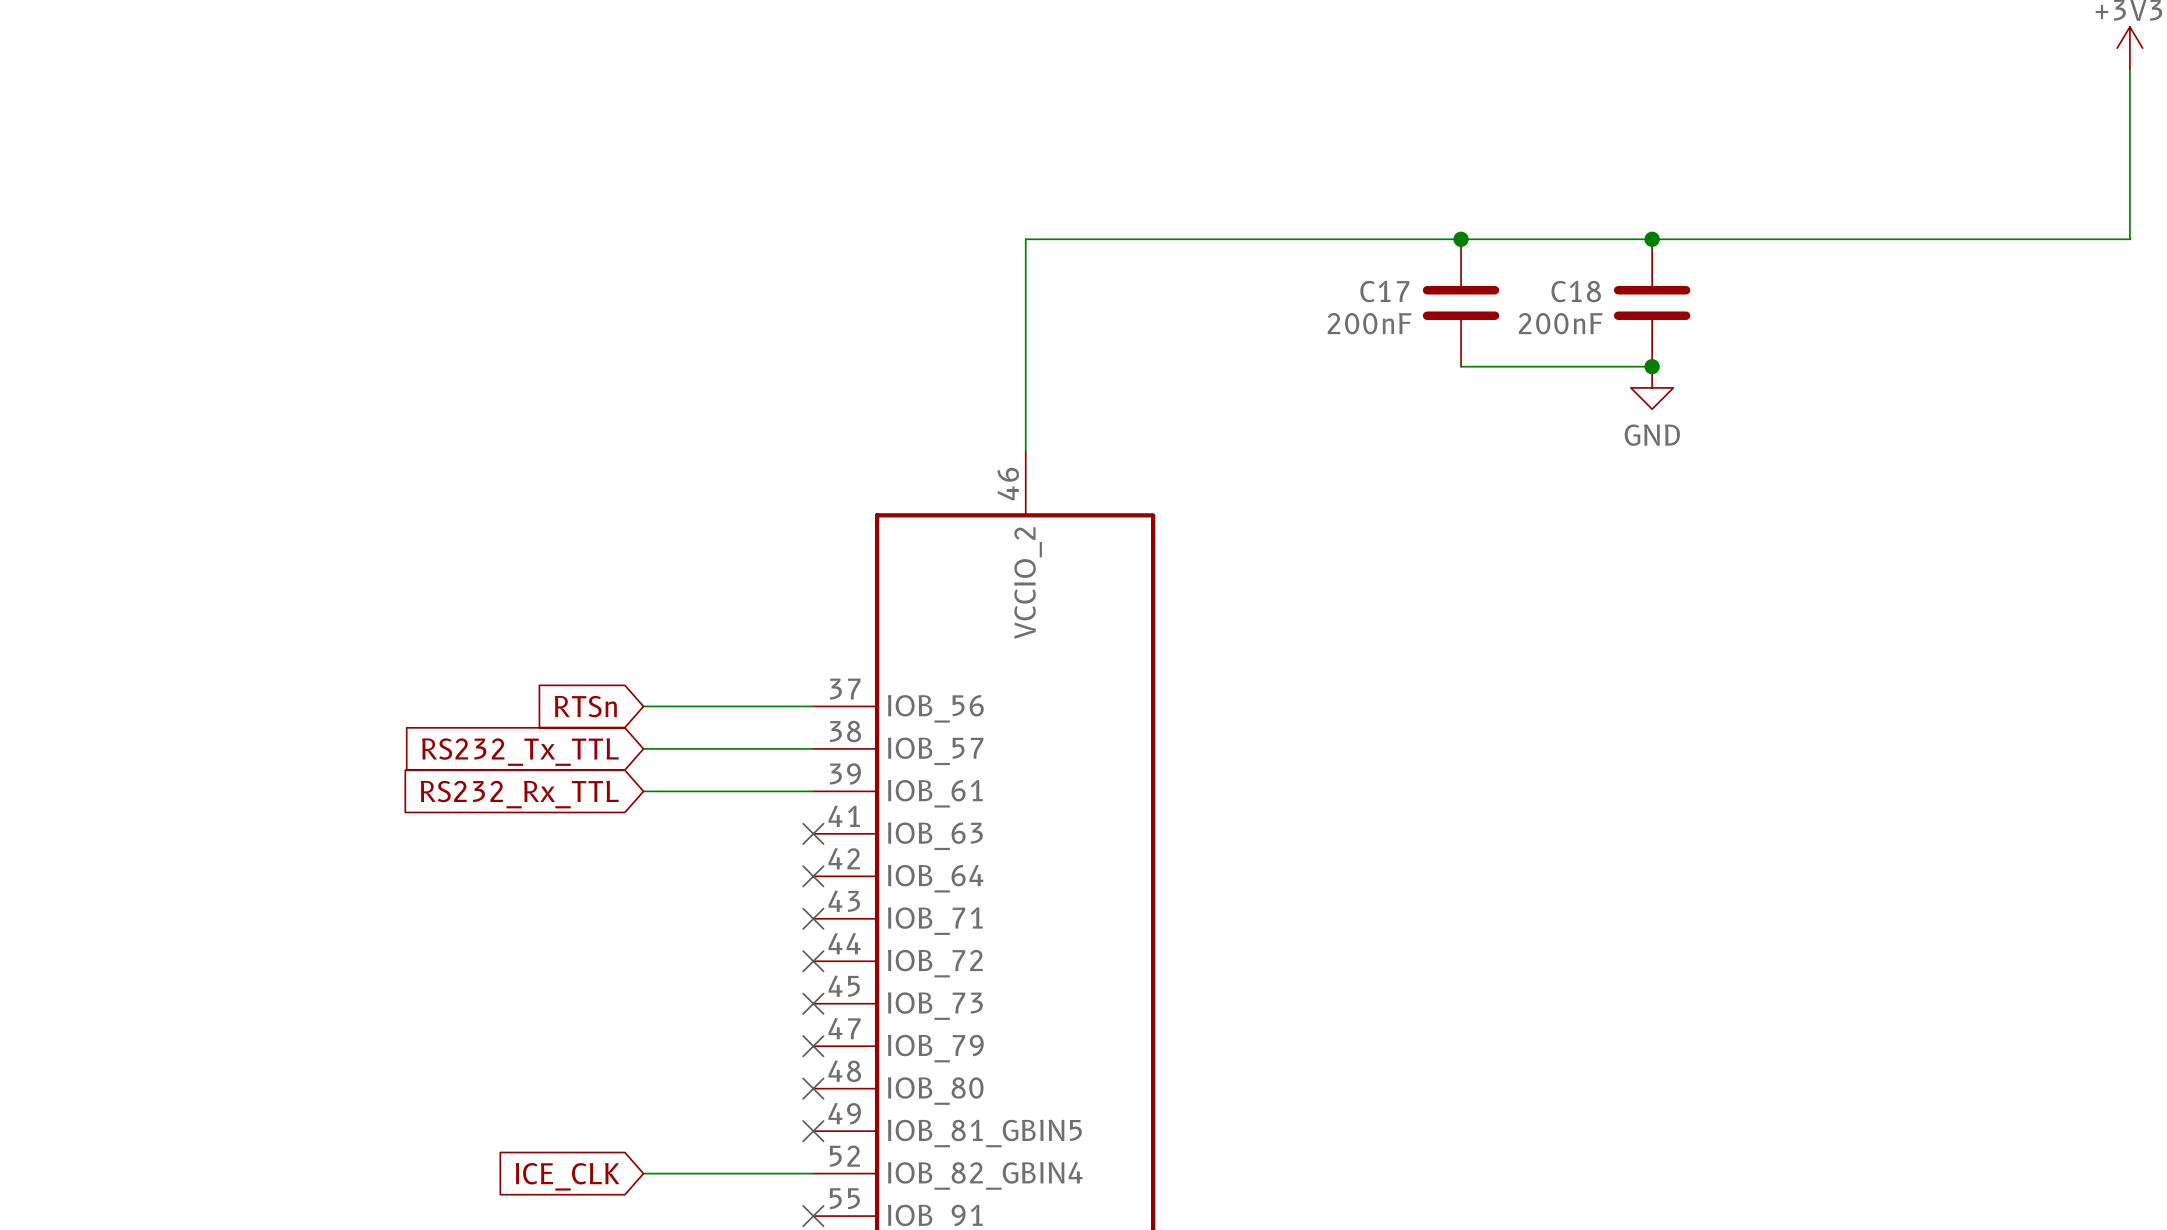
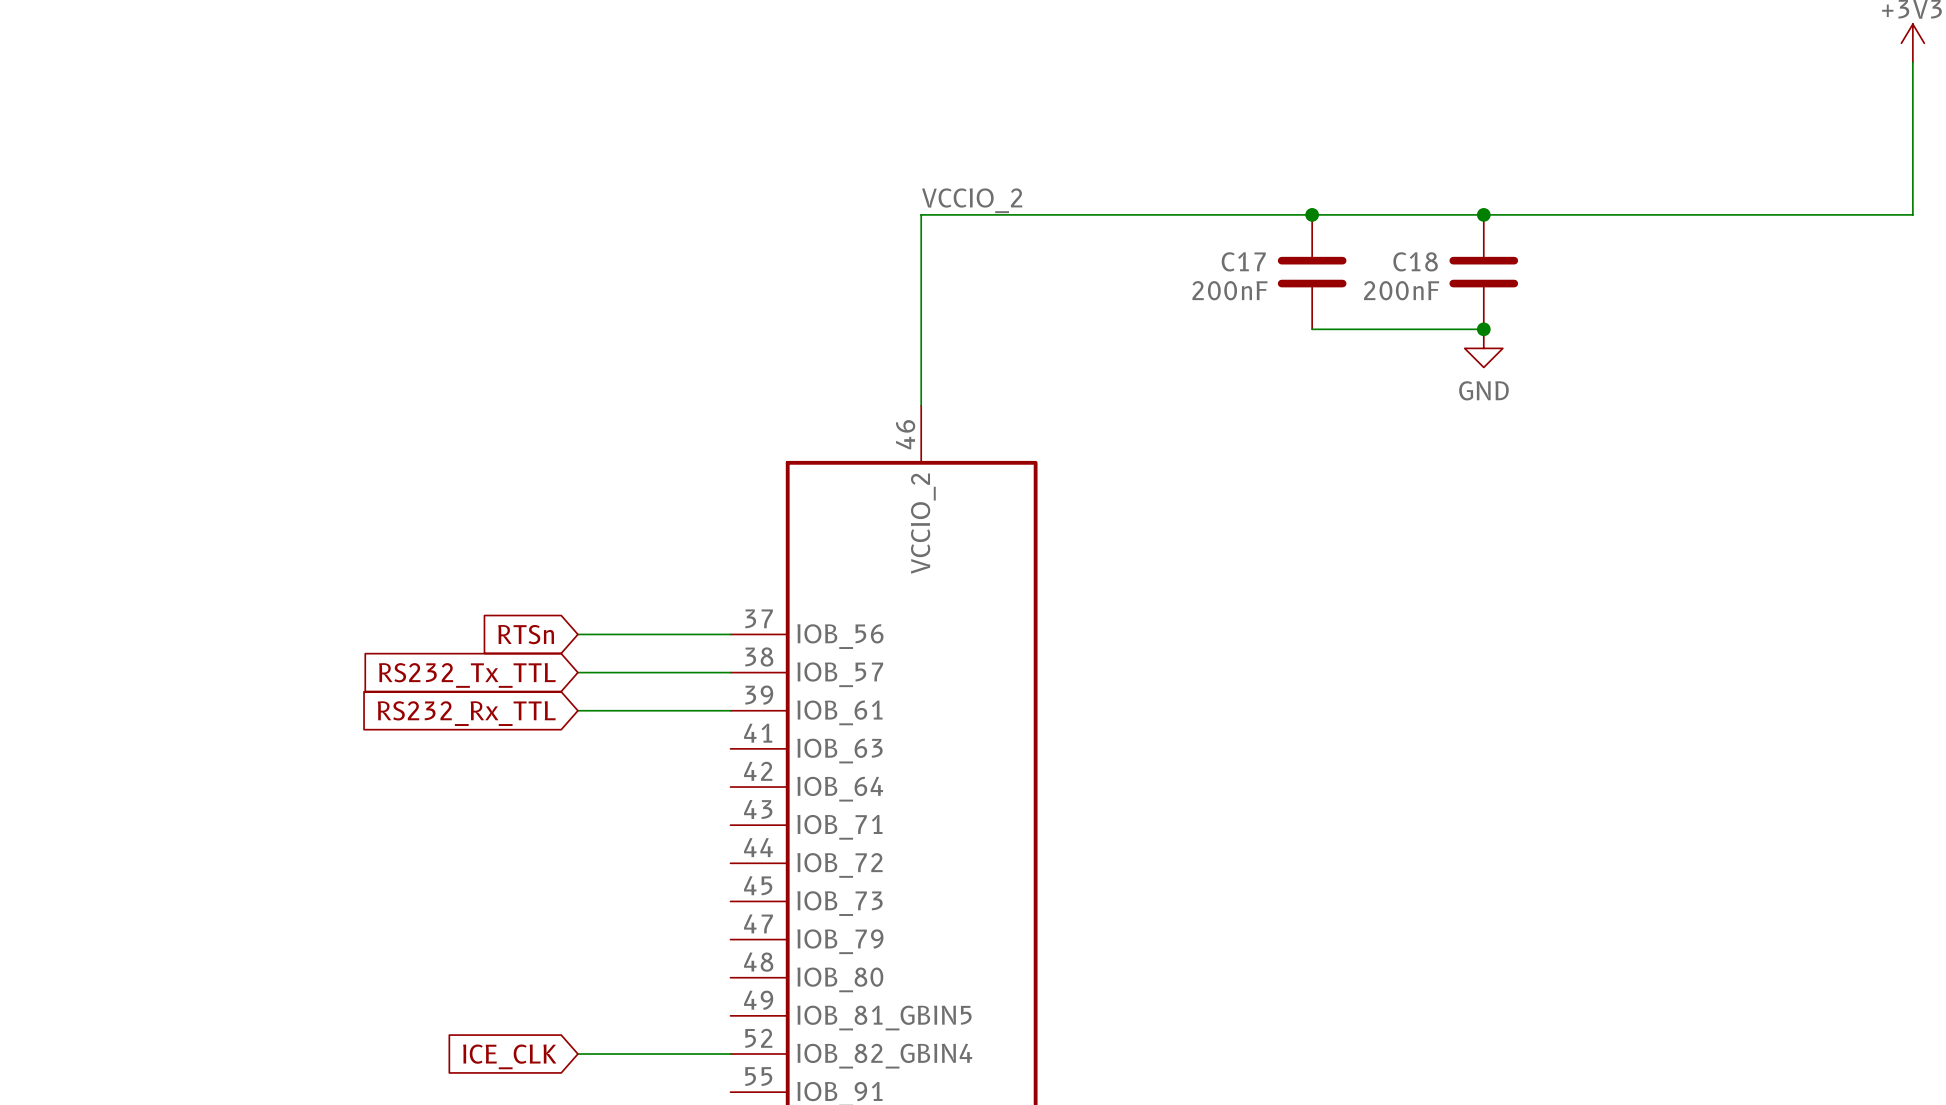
label: none -> VCCIO_2 (972, 200)
no-connect mark: (813, 833) -> none
no-connect mark: (813, 876) -> none
no-connect mark: (813, 918) -> none
no-connect mark: (813, 961) -> none
no-connect mark: (813, 1003) -> none
no-connect mark: (813, 1046) -> none
no-connect mark: (813, 1088) -> none
no-connect mark: (813, 1131) -> none
no-connect mark: (813, 1216) -> none

